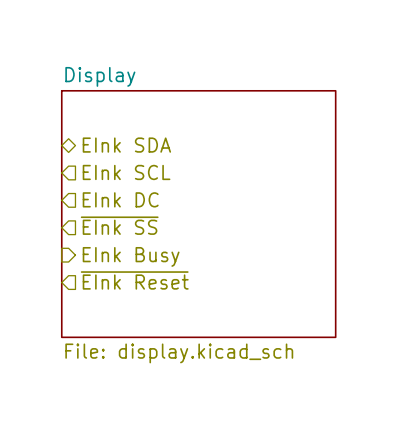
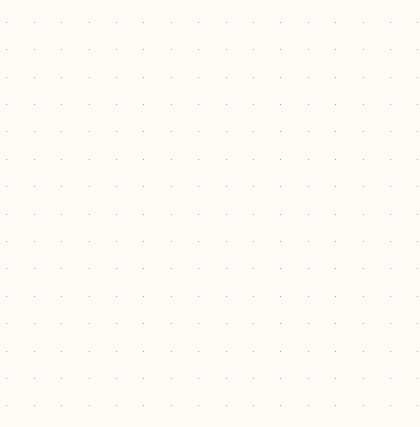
hierarchical label: EInk SDA (126, 145) -> none
hierarchical label: EInk SCL (126, 172) -> none
hierarchical label: EInk DC (120, 199) -> none
sheet Display: File: display.kicad_sch (198, 214) -> none
hierarchical label: ~{EInk SS} (119, 225) -> none
hierarchical label: EInk Busy (131, 256) -> none
hierarchical label: ~{EInk Reset} (134, 280) -> none

